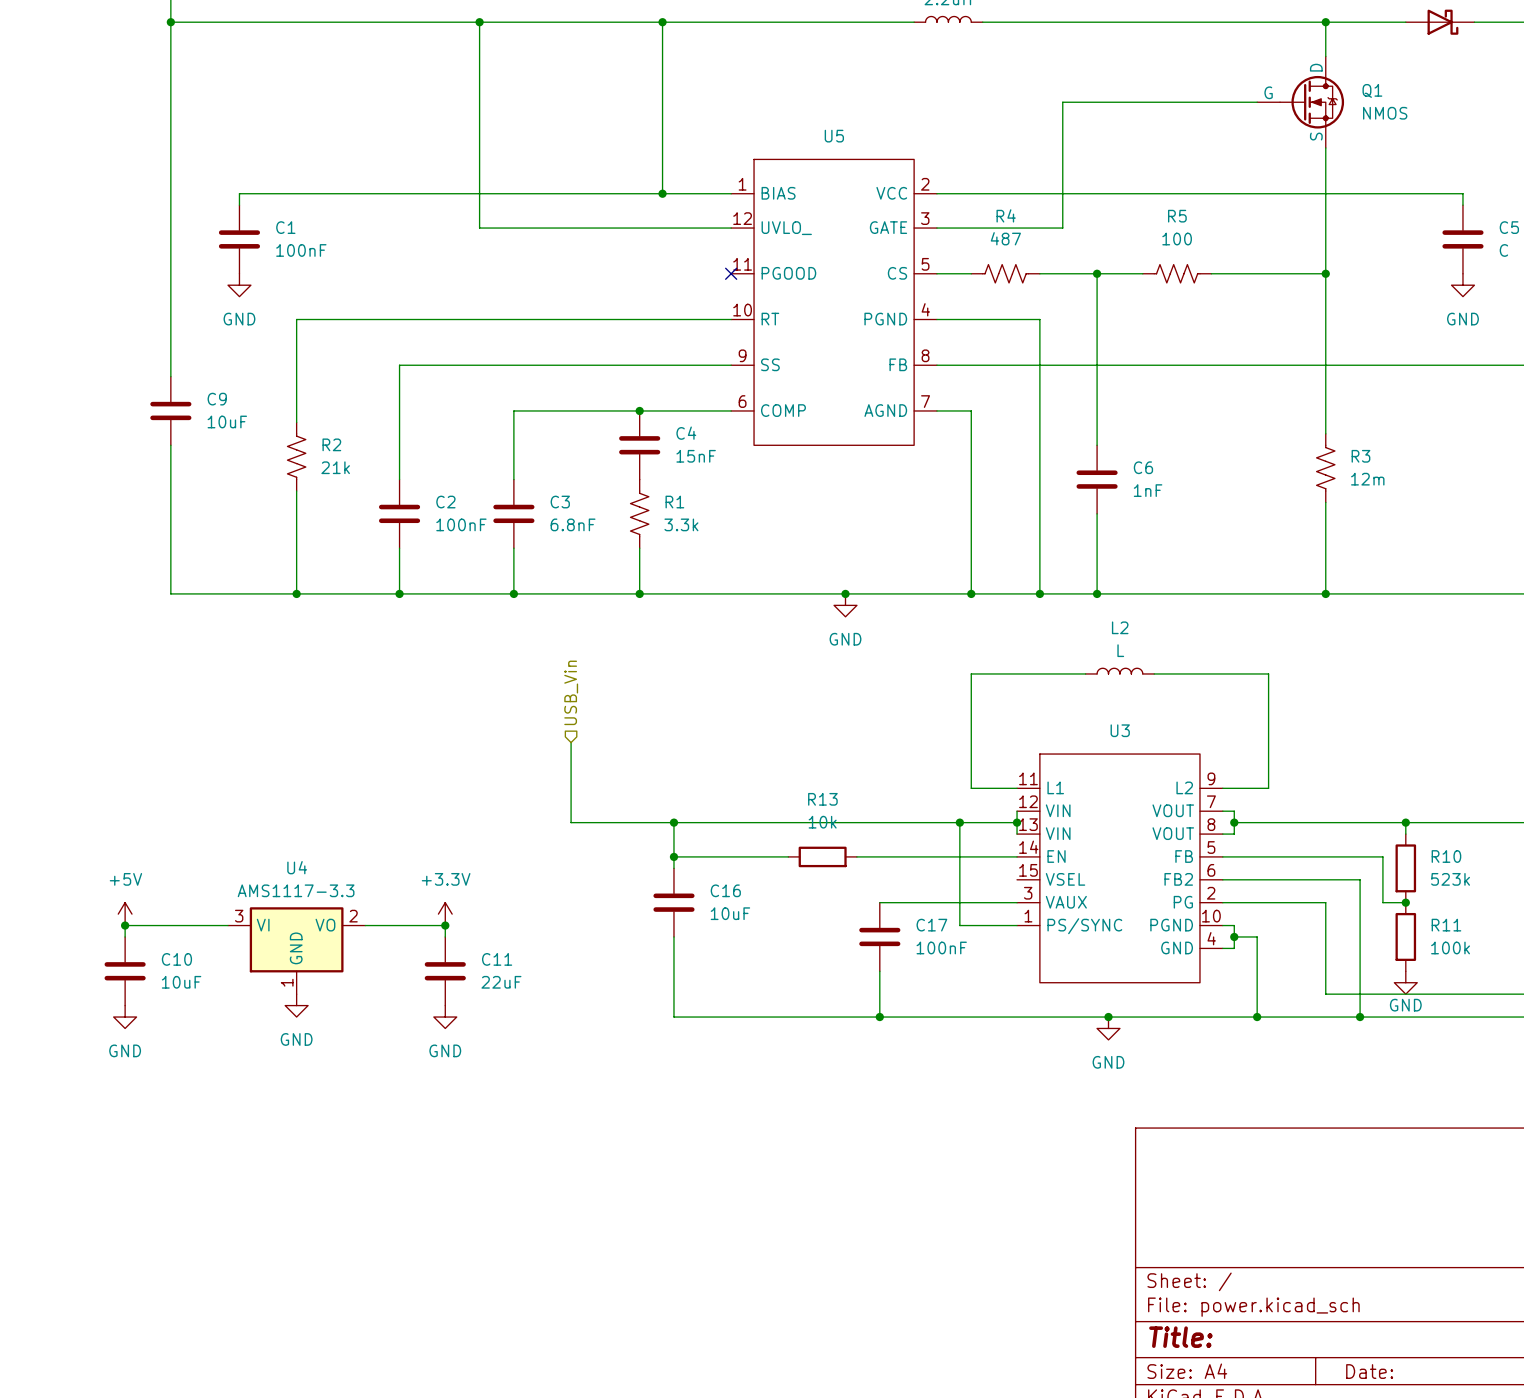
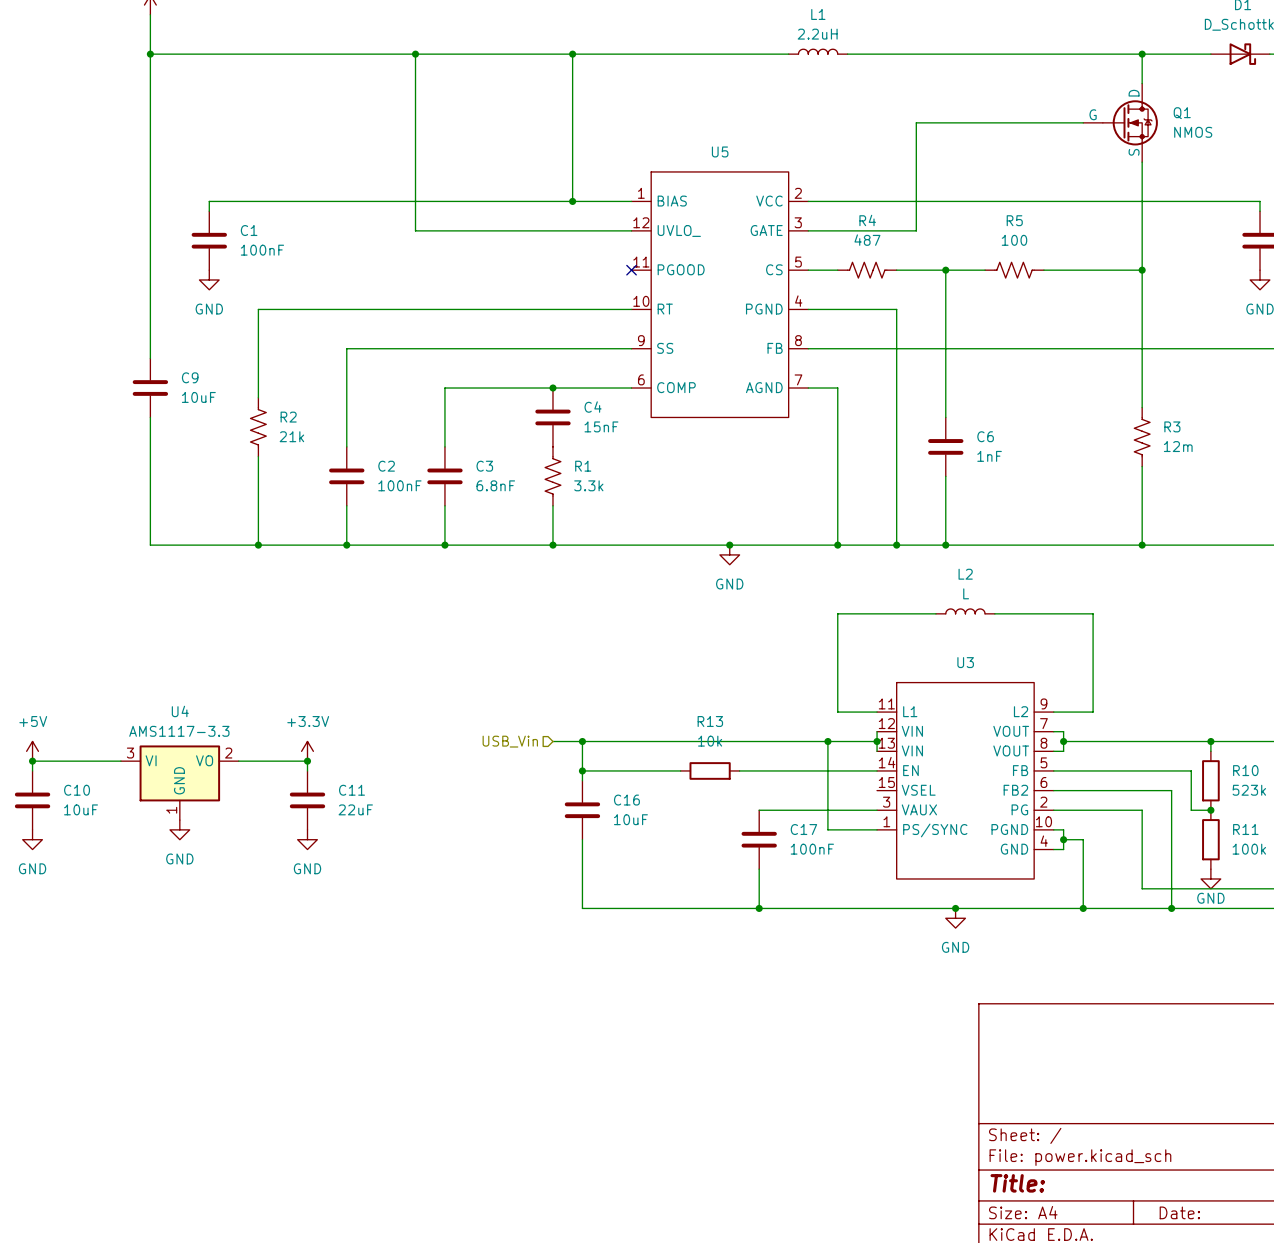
hierarchical label rotation: 0° (571, 692) -> 90° counterclockwise (510, 741)
hierarchical label position: USB_Vin (571, 692) -> USB_Vin (510, 741)
wire: (571, 742) (571, 822) (639, 822) -> none
junction: none -> (32, 761)
junction: none -> (307, 761)
power symbol position: +5V (125, 914) -> +5V (32, 751)
power symbol position: +3.3V (445, 914) -> +3.3V (307, 751)
junction: (125, 925) -> none
power symbol: none -> GND (179, 829)
wire: (228, 925) (125, 925) (125, 936) -> (120, 761) (32, 761) (32, 770)
wire: (365, 925) (445, 925) (445, 936) -> (238, 761) (307, 761) (307, 770)
junction: (445, 925) -> none
power symbol: none -> GND (32, 839)
power symbol: none -> GND (307, 839)
U4 position: (296, 950) -> (179, 782)
C10 position: (125, 971) -> (32, 800)
C11 position: (445, 971) -> (307, 800)
power symbol: GND (296, 1005) -> none
power symbol: GND (125, 1017) -> none
power symbol: GND (445, 1017) -> none

